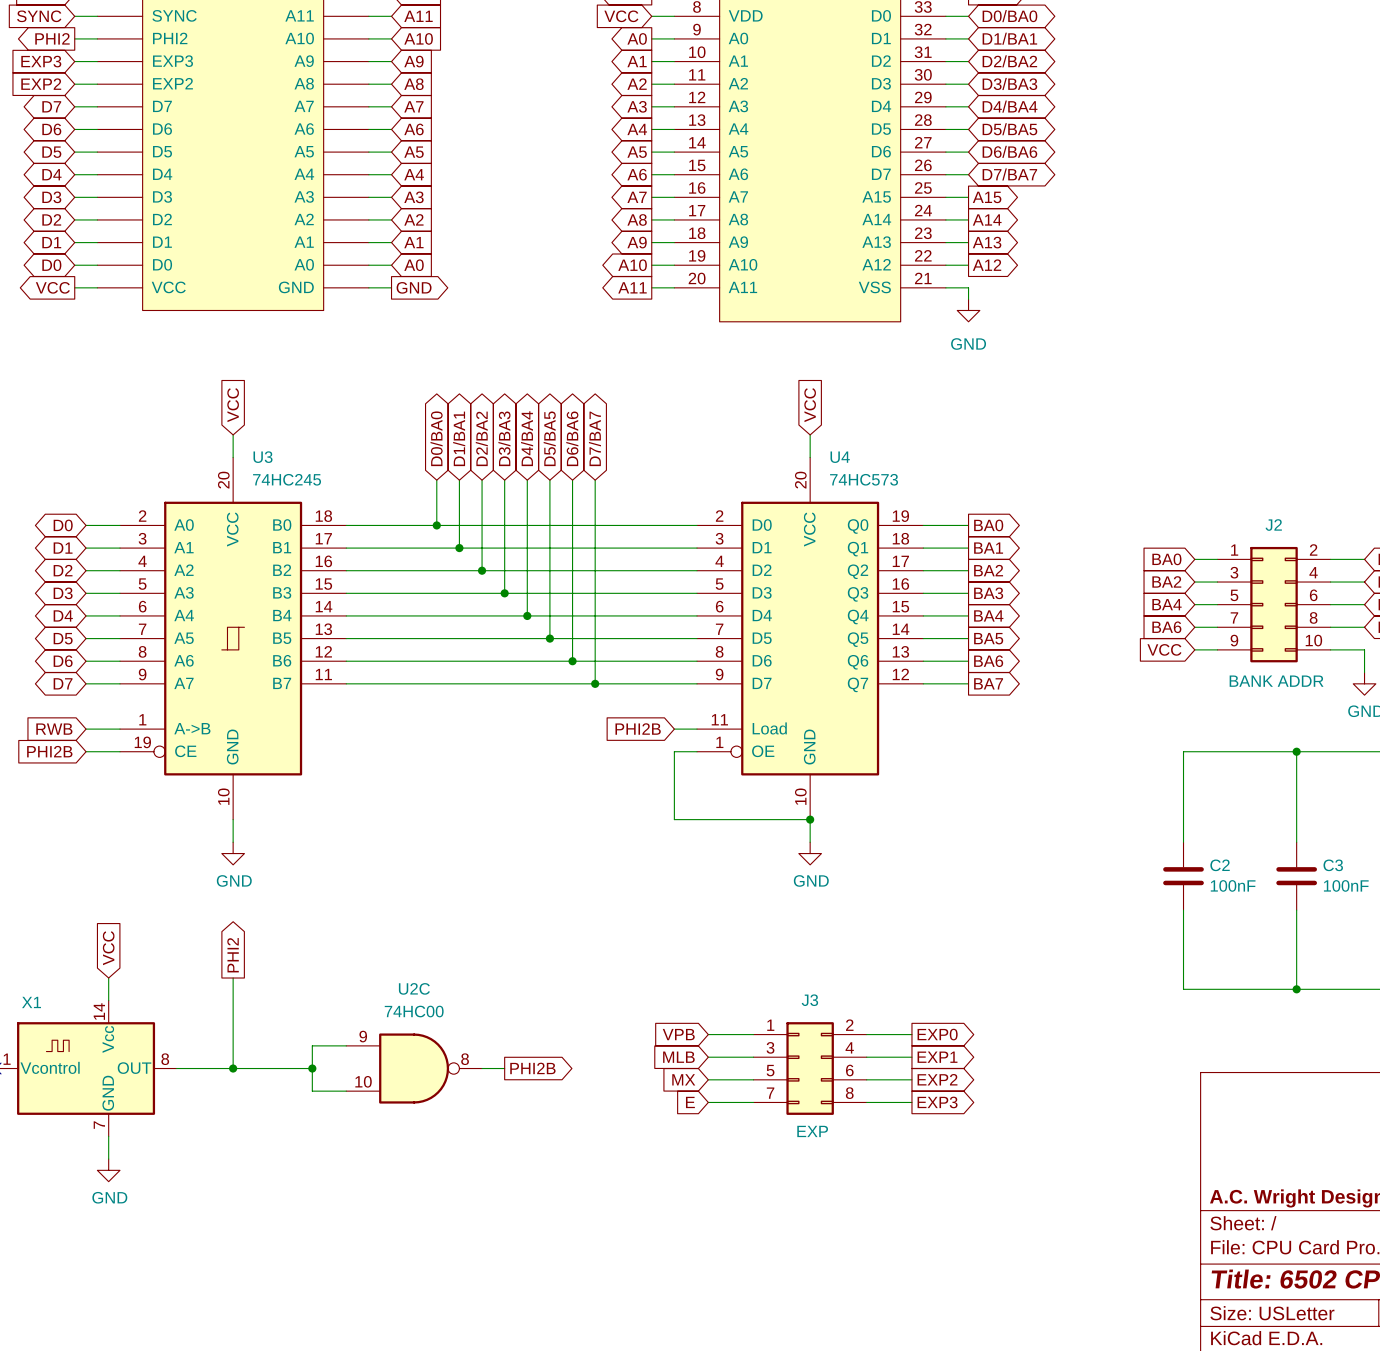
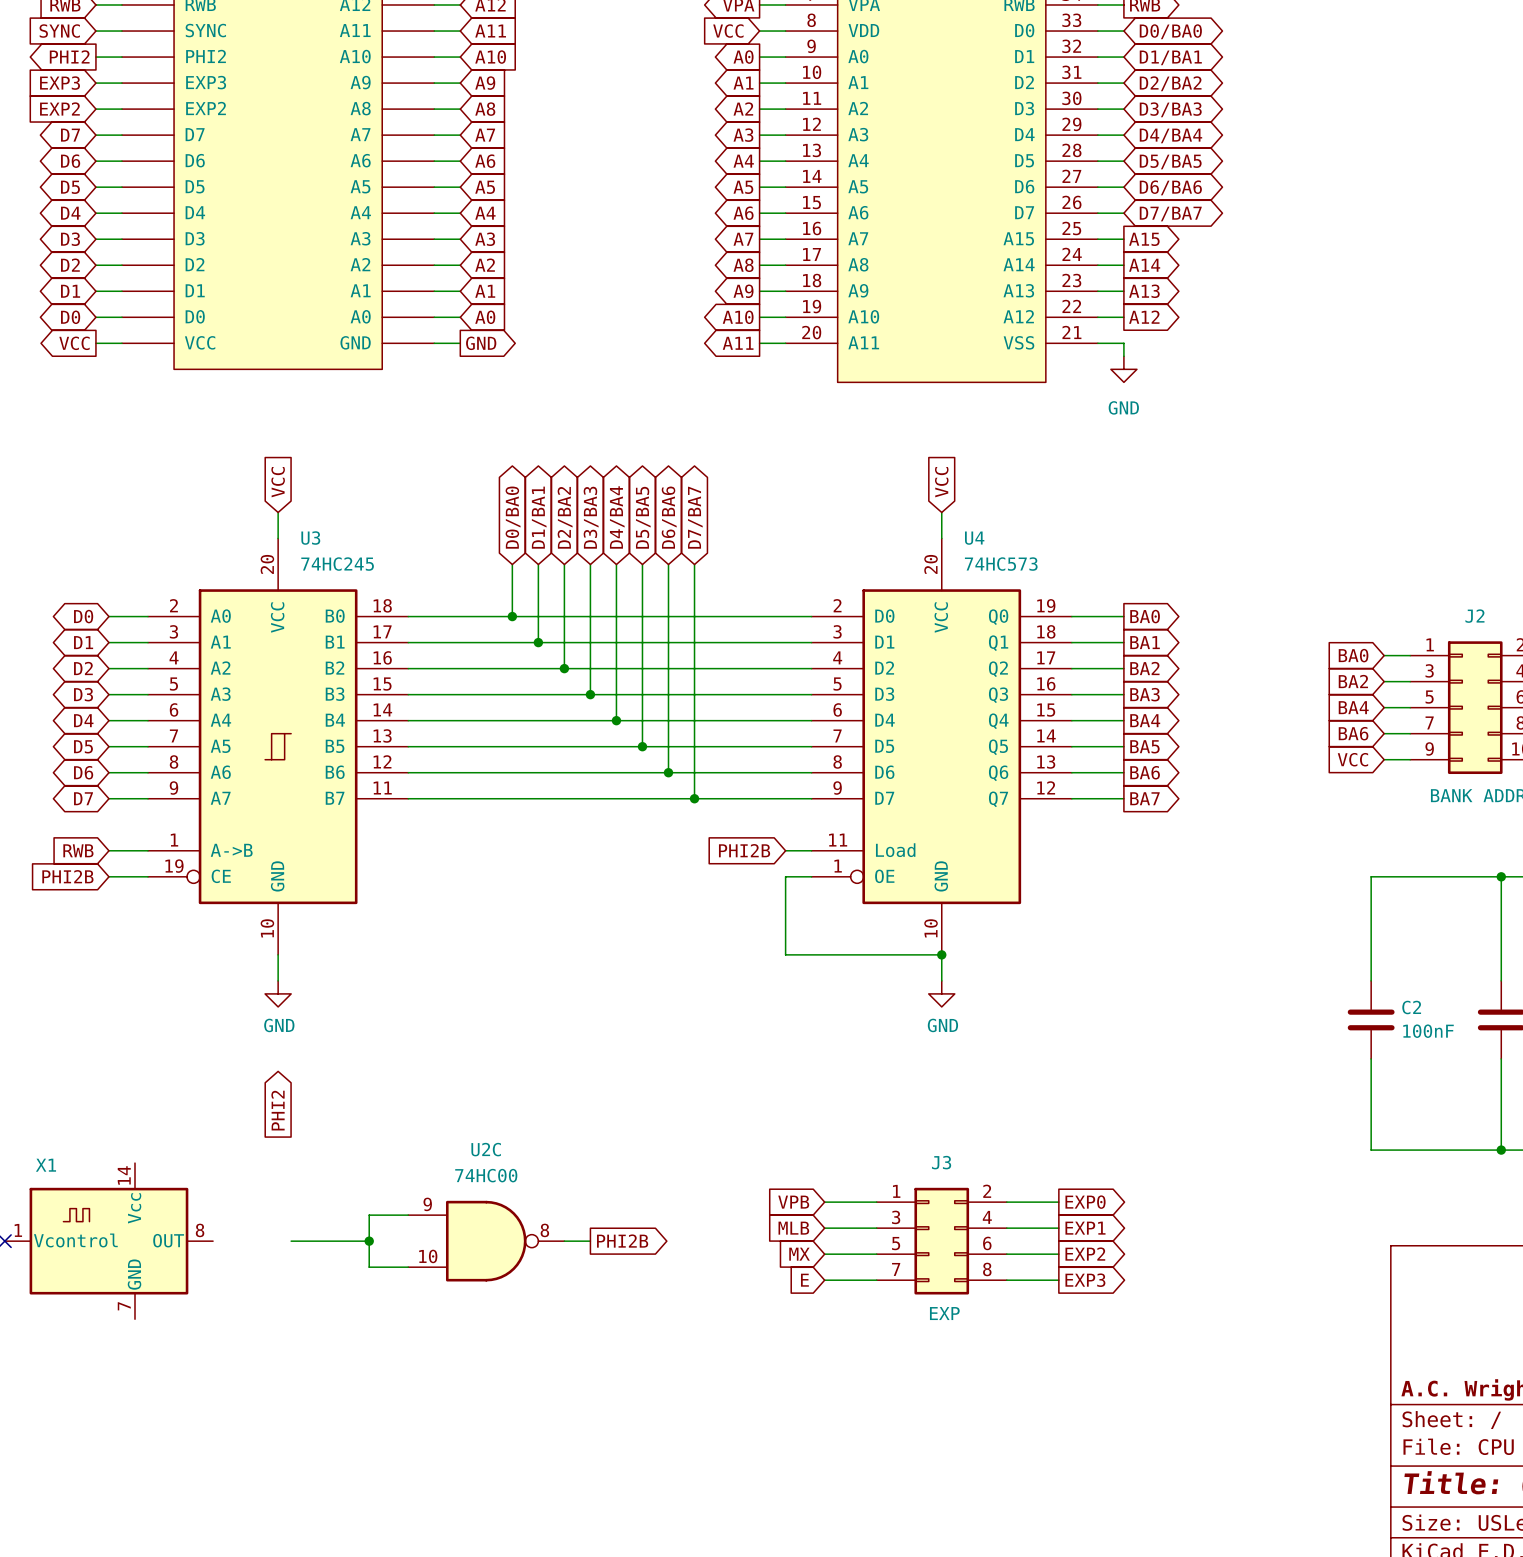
global label: VCC (108, 948) -> none
wire: (108, 978) (108, 1000) -> none
wire: (233, 978) (233, 1068) -> none
wire: (176, 1068) (244, 1068) -> none
junction: (233, 1068) -> none
wire: (108, 1136) (108, 1159) -> none
power symbol: GND (108, 1170) -> none

